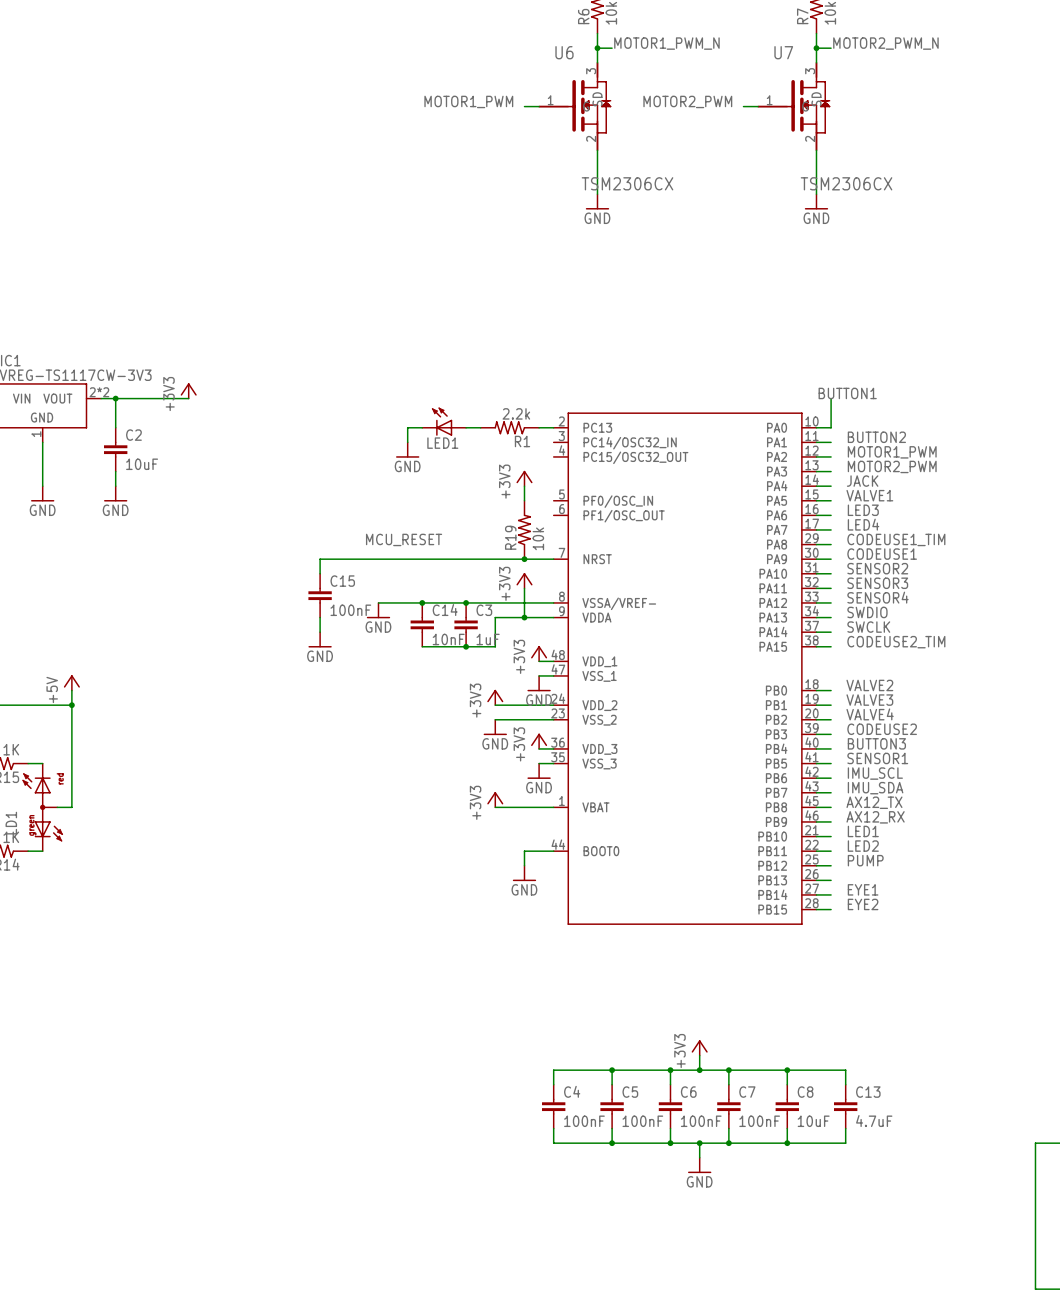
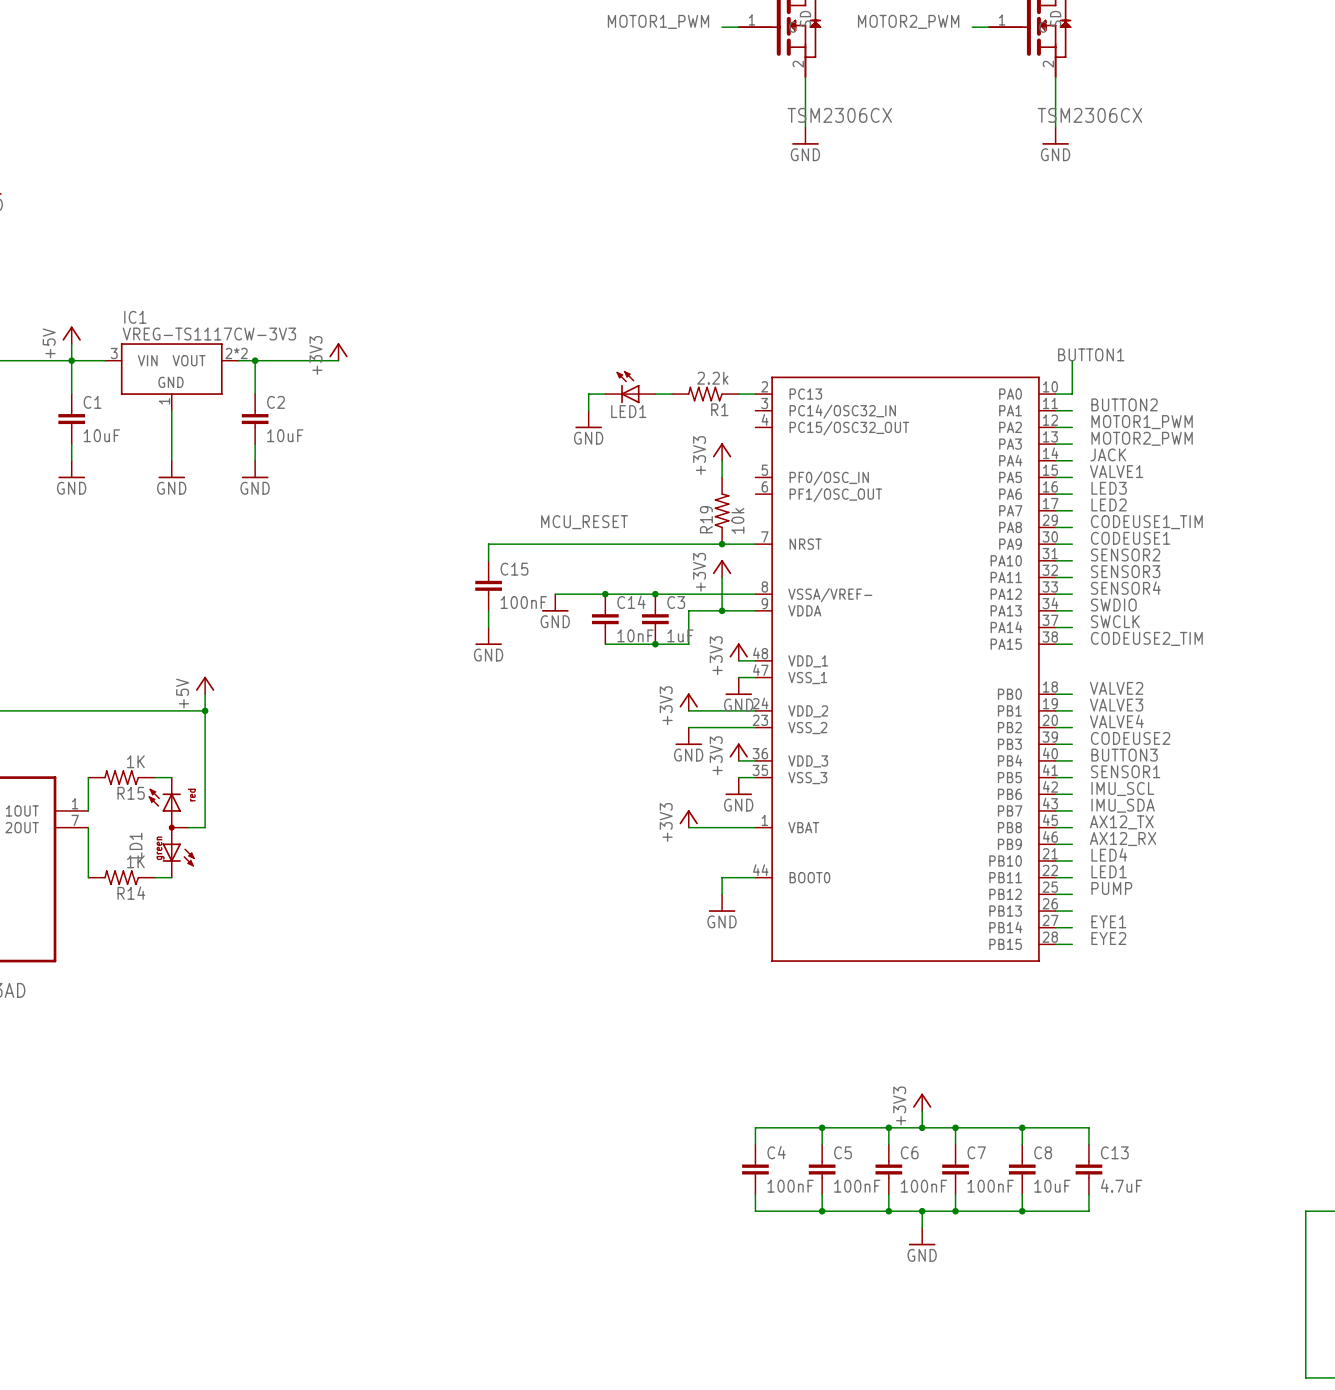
label: LED4 (863, 524) -> LED2 (1109, 504)
label: LED1 (863, 831) -> LED4 (1109, 854)
label: LED2 (863, 846) -> LED1 (1109, 871)

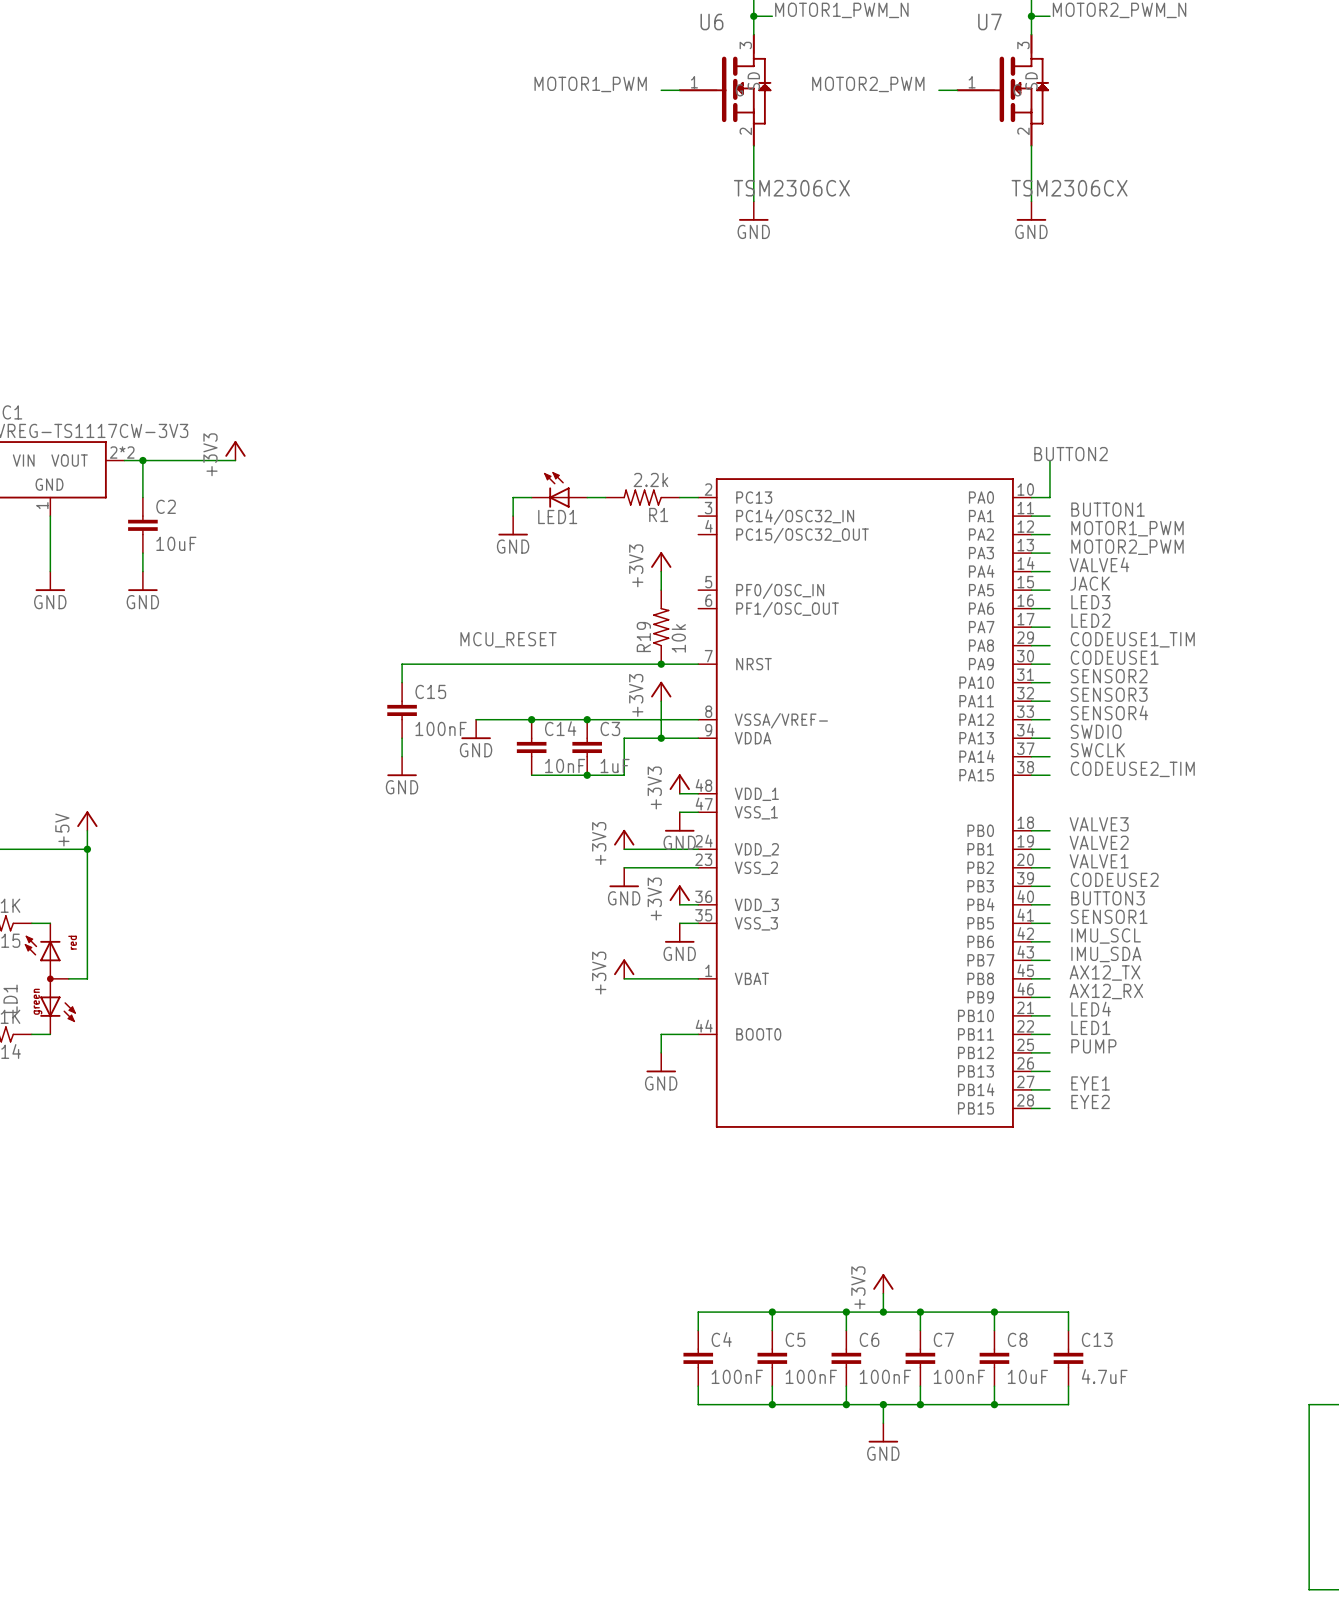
label: BUTTON1 (1091, 354) -> BUTTON2 (1071, 454)
label: BUTTON2 (1124, 404) -> BUTTON1 (1108, 509)
label: JACK (1108, 454) -> VALVE4 (1099, 564)
label: VALVE1 (1116, 471) -> JACK (1090, 583)
label: VALVE2 (1116, 688) -> VALVE3 (1099, 824)
label: VALVE3 (1116, 705) -> VALVE2 (1099, 842)
label: VALVE4 (1116, 721) -> VALVE1 (1099, 861)

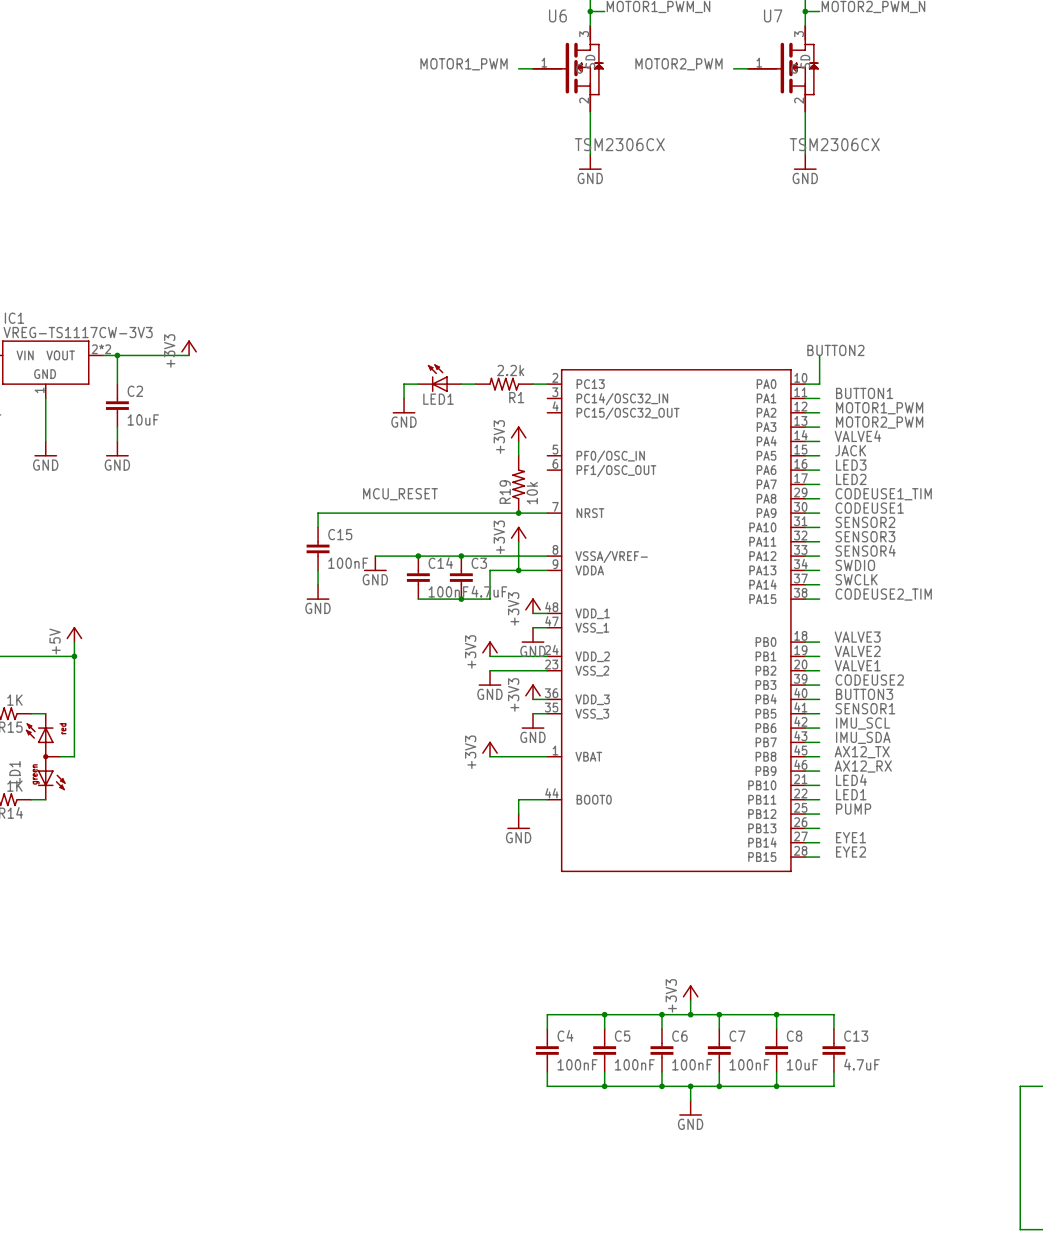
C14 value: 10nF (565, 765) -> 100nF (448, 591)
C3 value: 1uF (615, 765) -> 4.7uF (489, 591)

